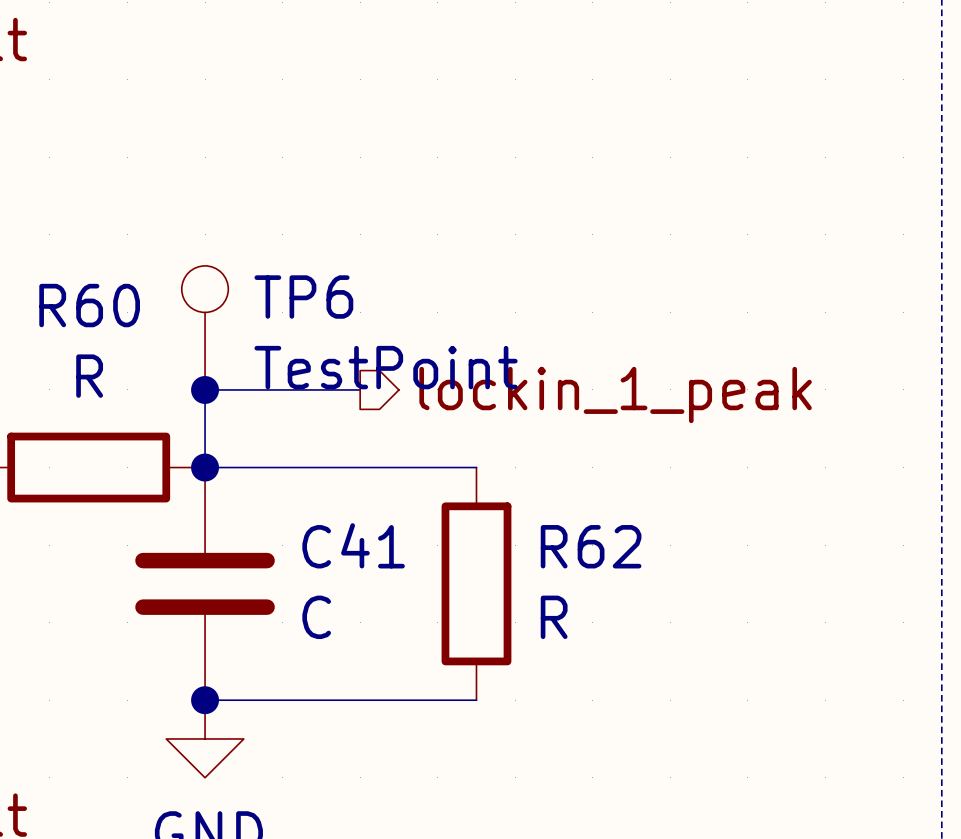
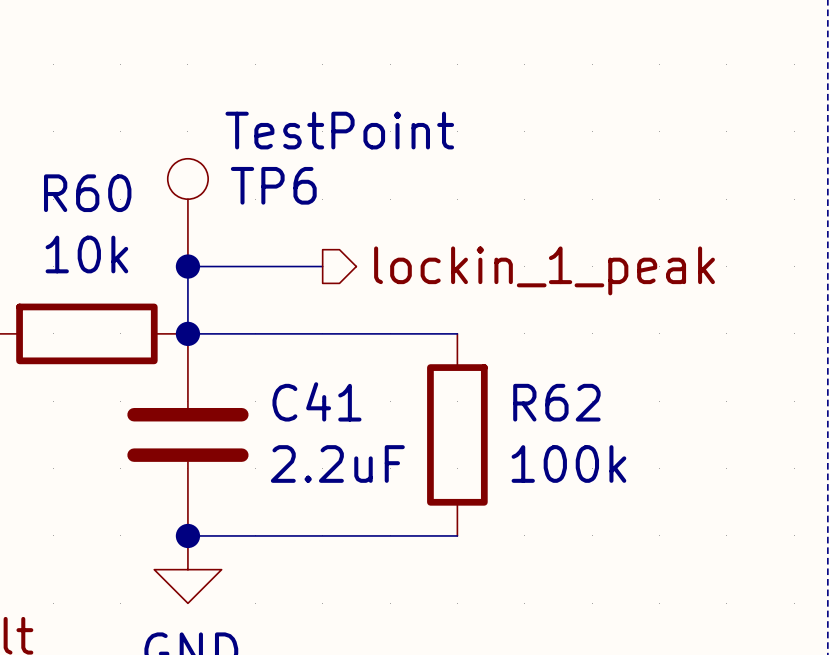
TP6 value position: TestPoint (386, 367) -> TestPoint (339, 130)
R60 value: R (89, 376) -> 10k (86, 254)
wire: none -> (423, 333) (457, 333)
R62 position: (476, 583) -> (457, 434)
C41 value: C (316, 617) -> 2.2uF (337, 463)
R62 value: R (554, 617) -> 100k (568, 463)
wire: none -> (423, 535) (457, 535)

